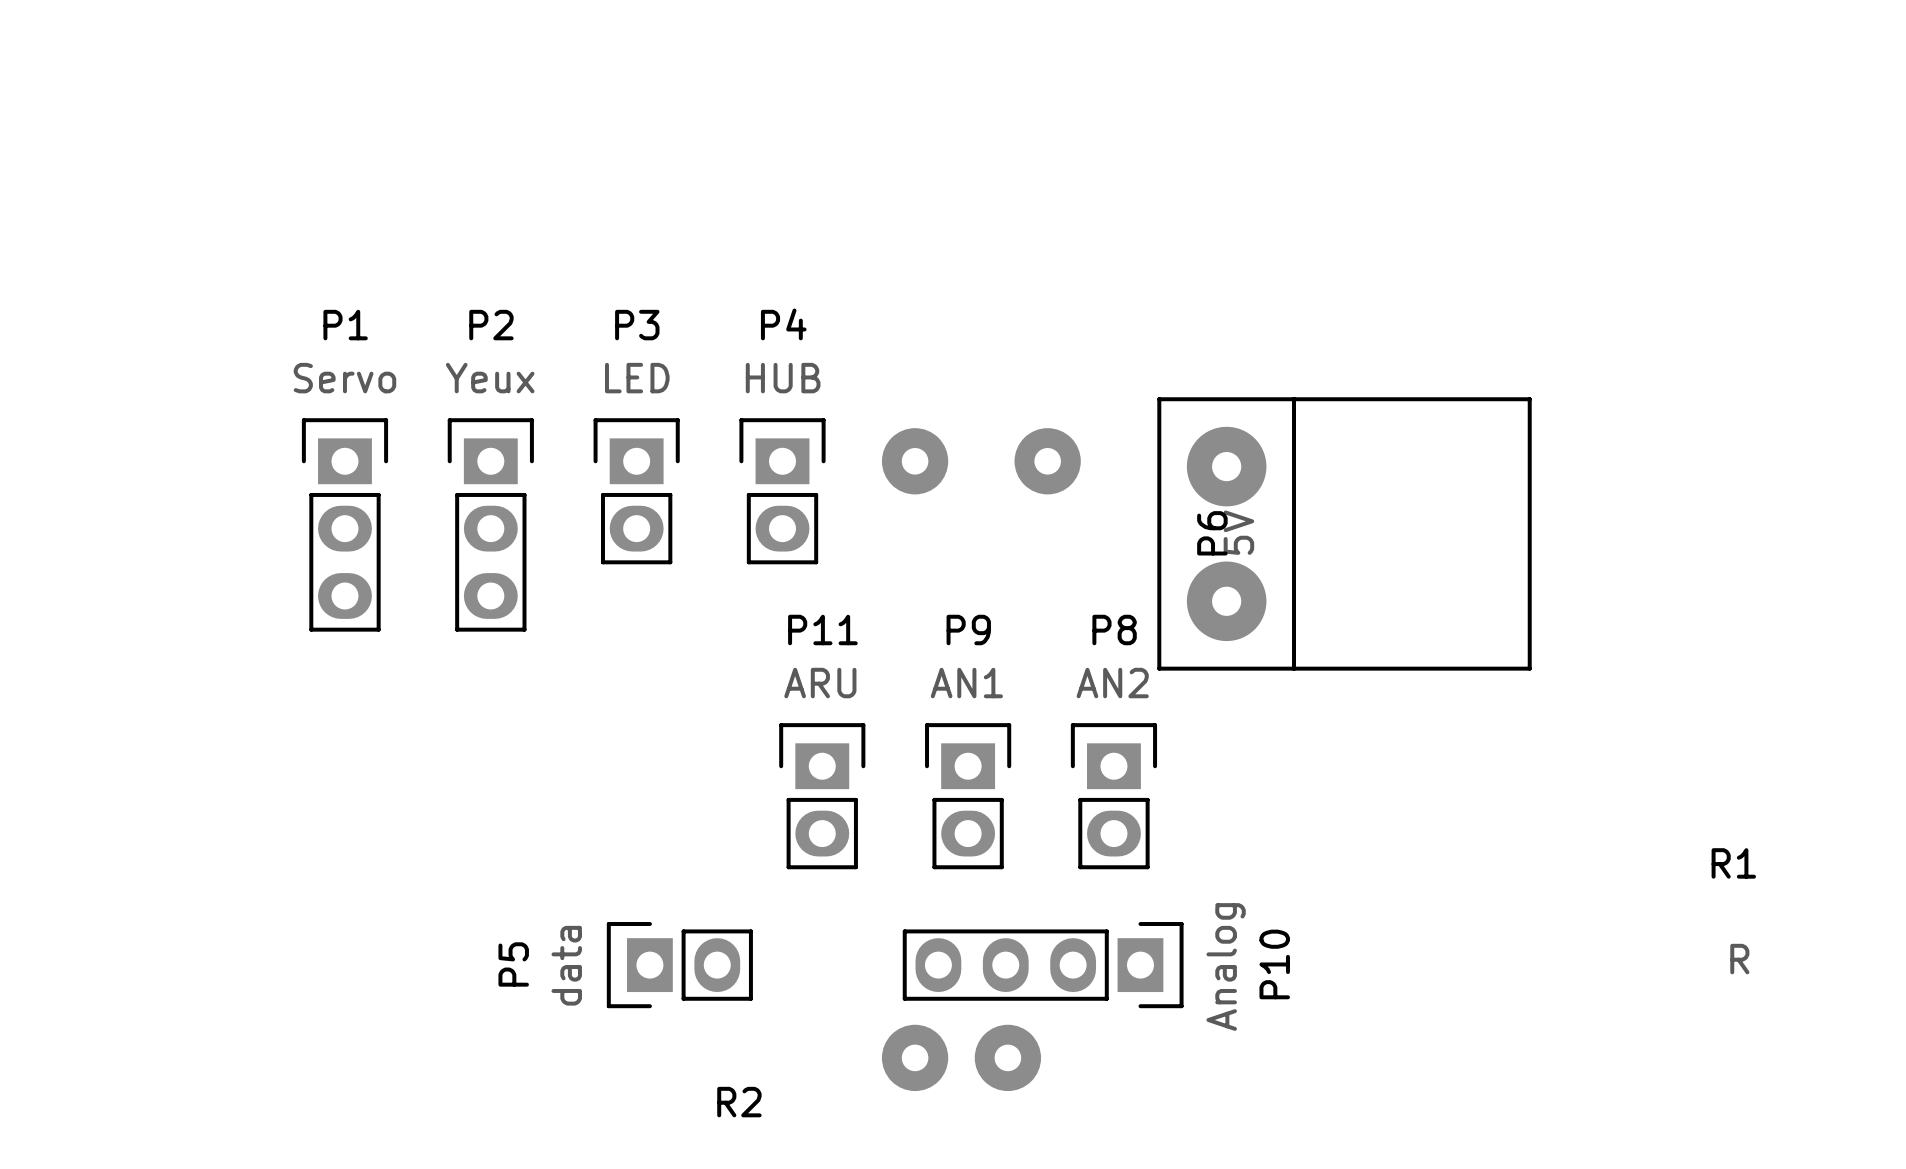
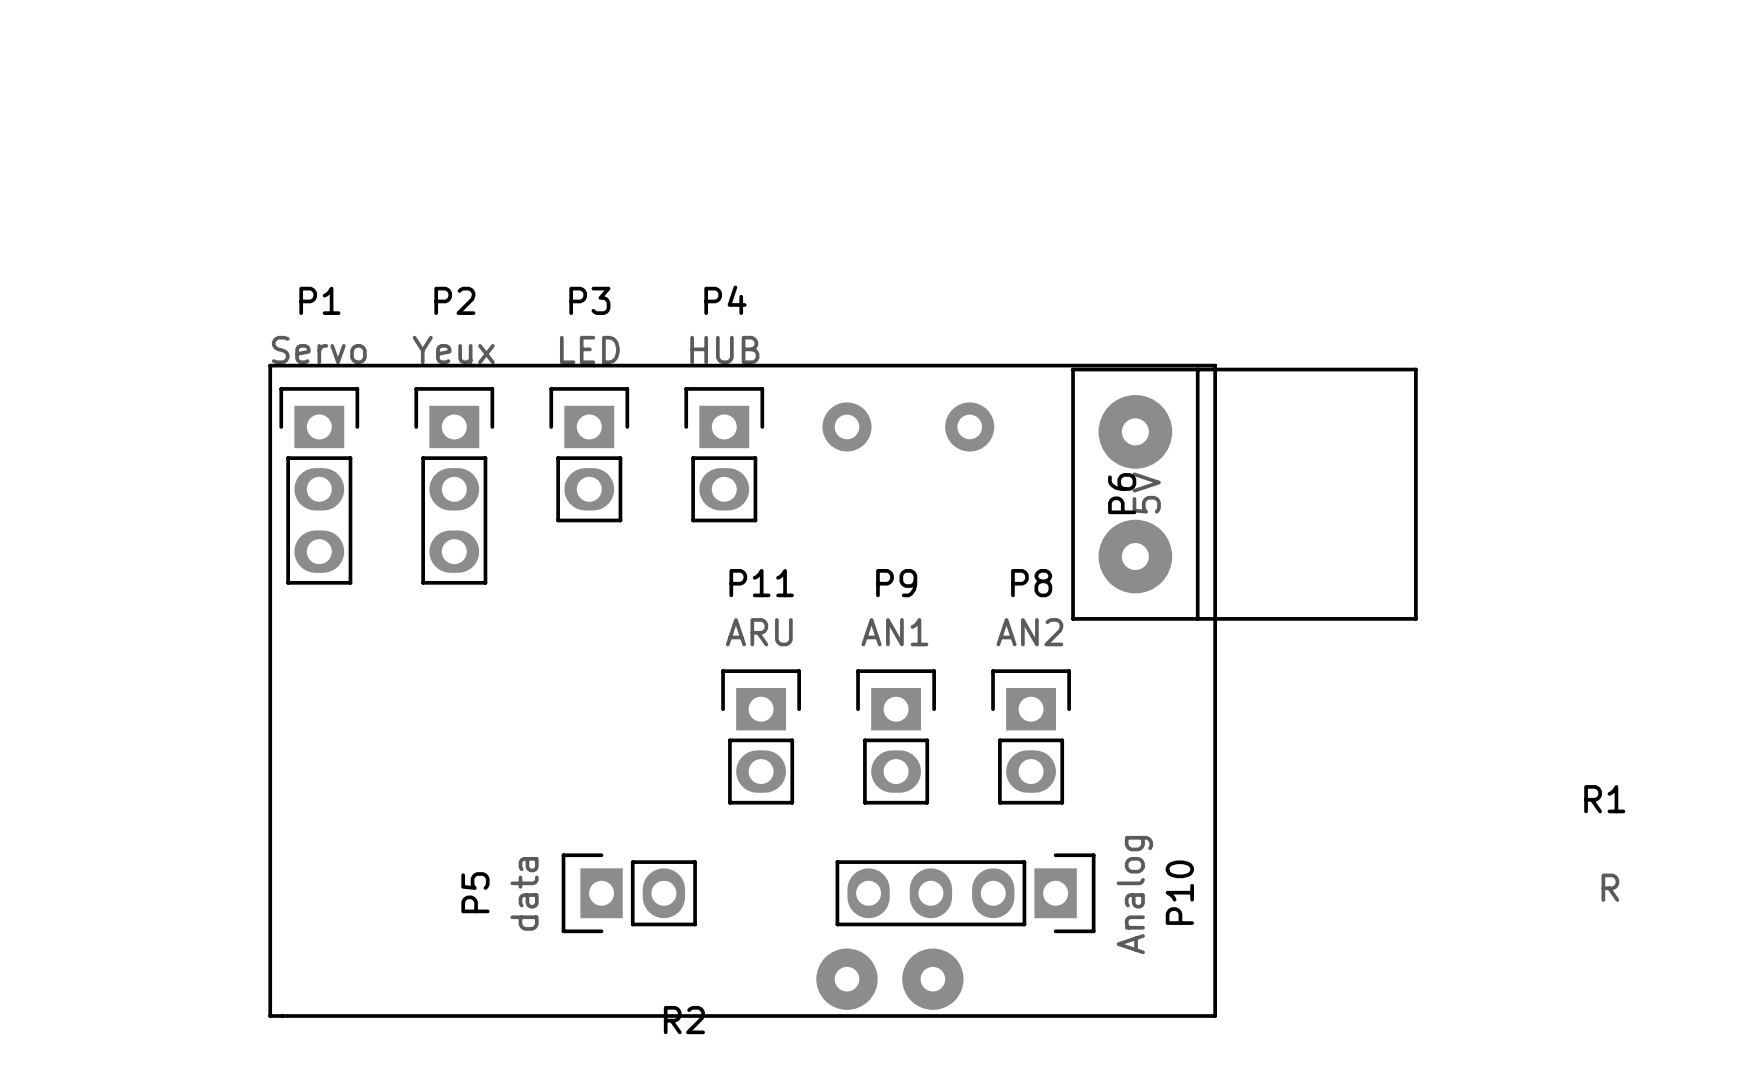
board edge: none -> (270, 365) (270, 1016) (1215, 1016) (1215, 365) (270, 365)
R1 footprint: [881, 428, 949, 1092] -> [816, 402, 878, 1010]
R2 footprint: [974, 428, 1081, 1092] -> [902, 402, 995, 1010]

